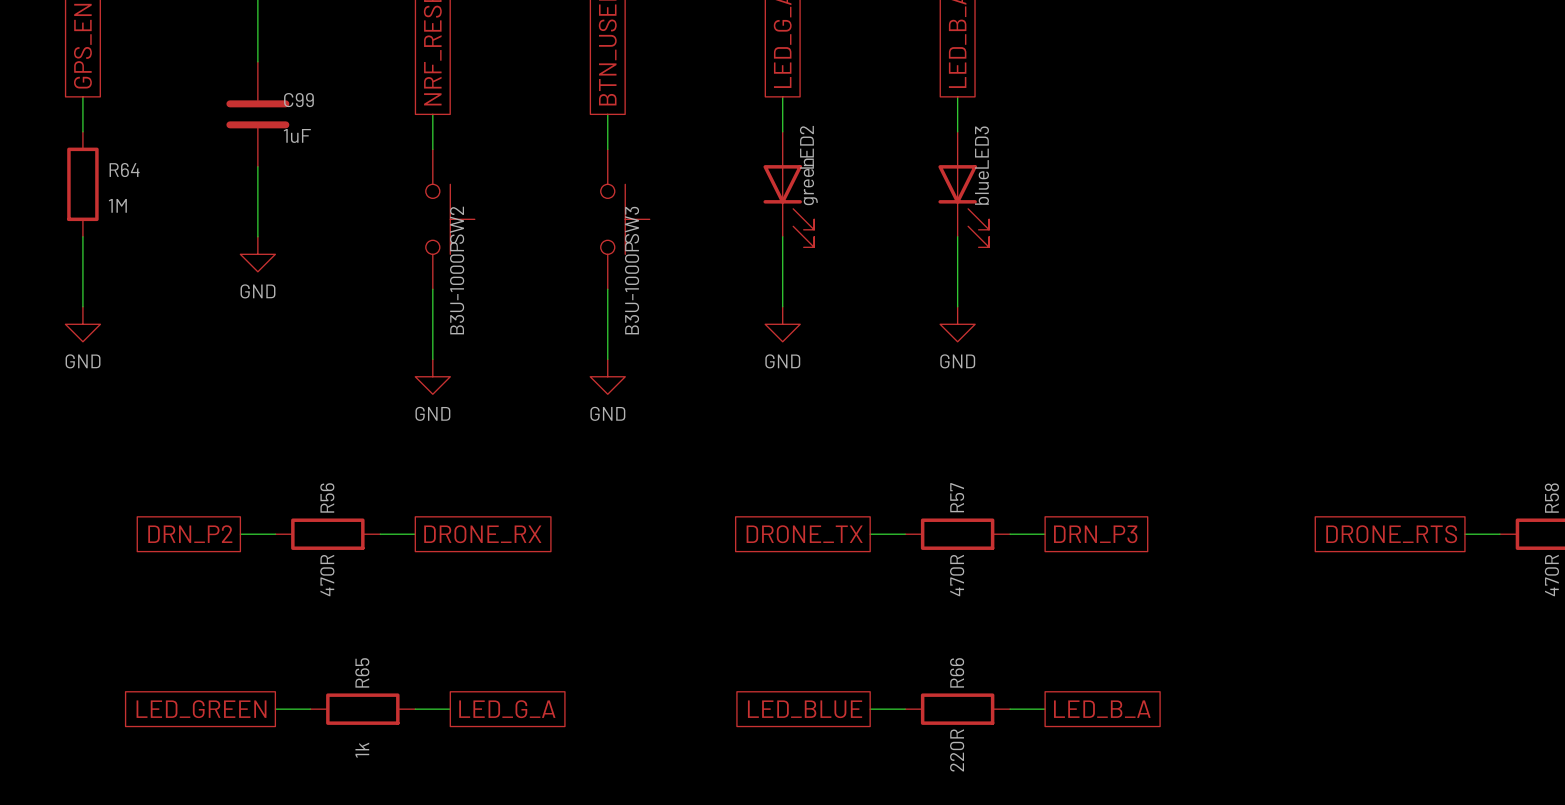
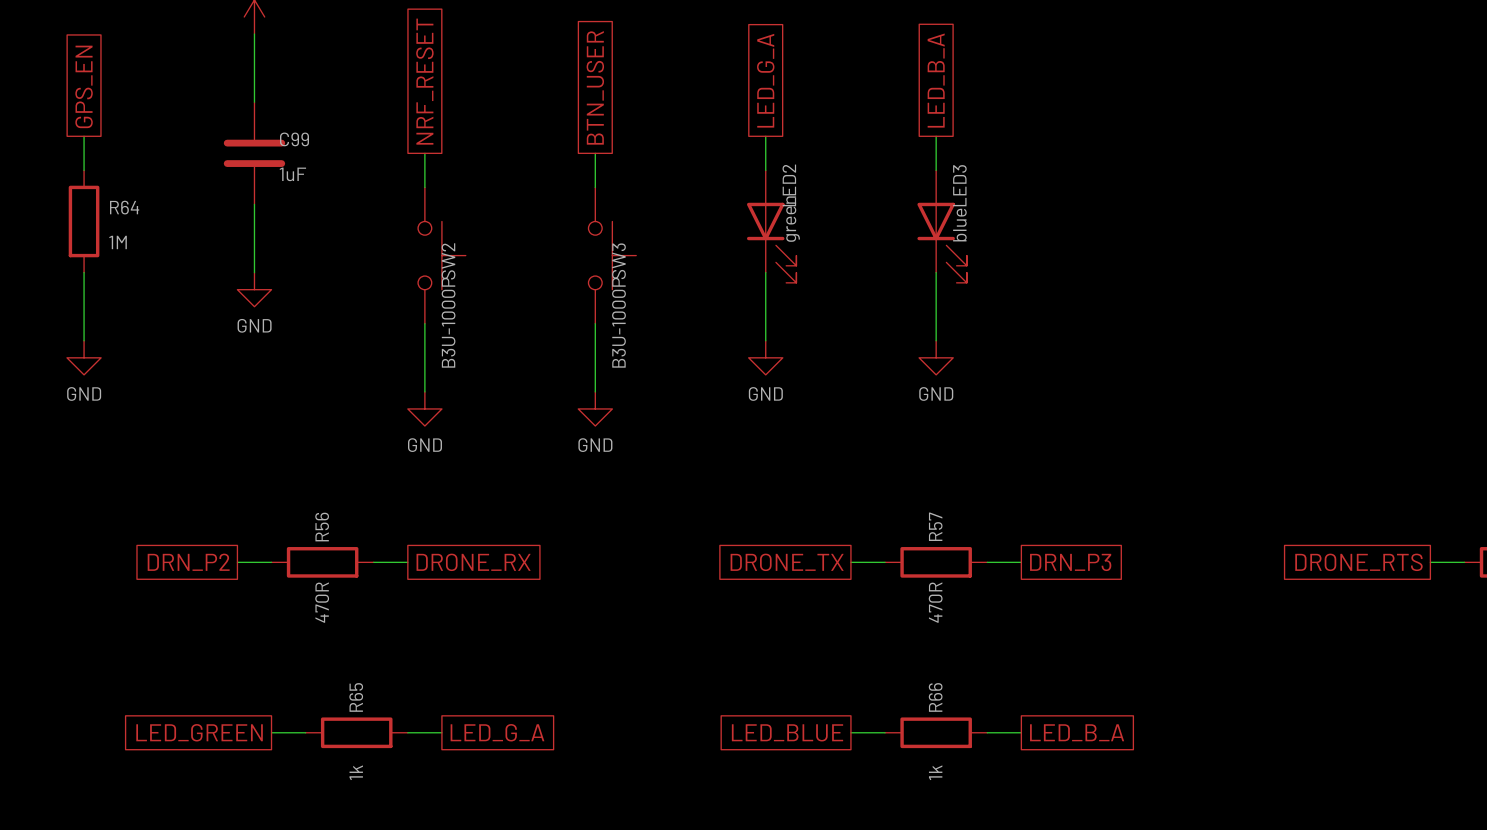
R66 value: 220R (957, 750) -> 1k (935, 772)

